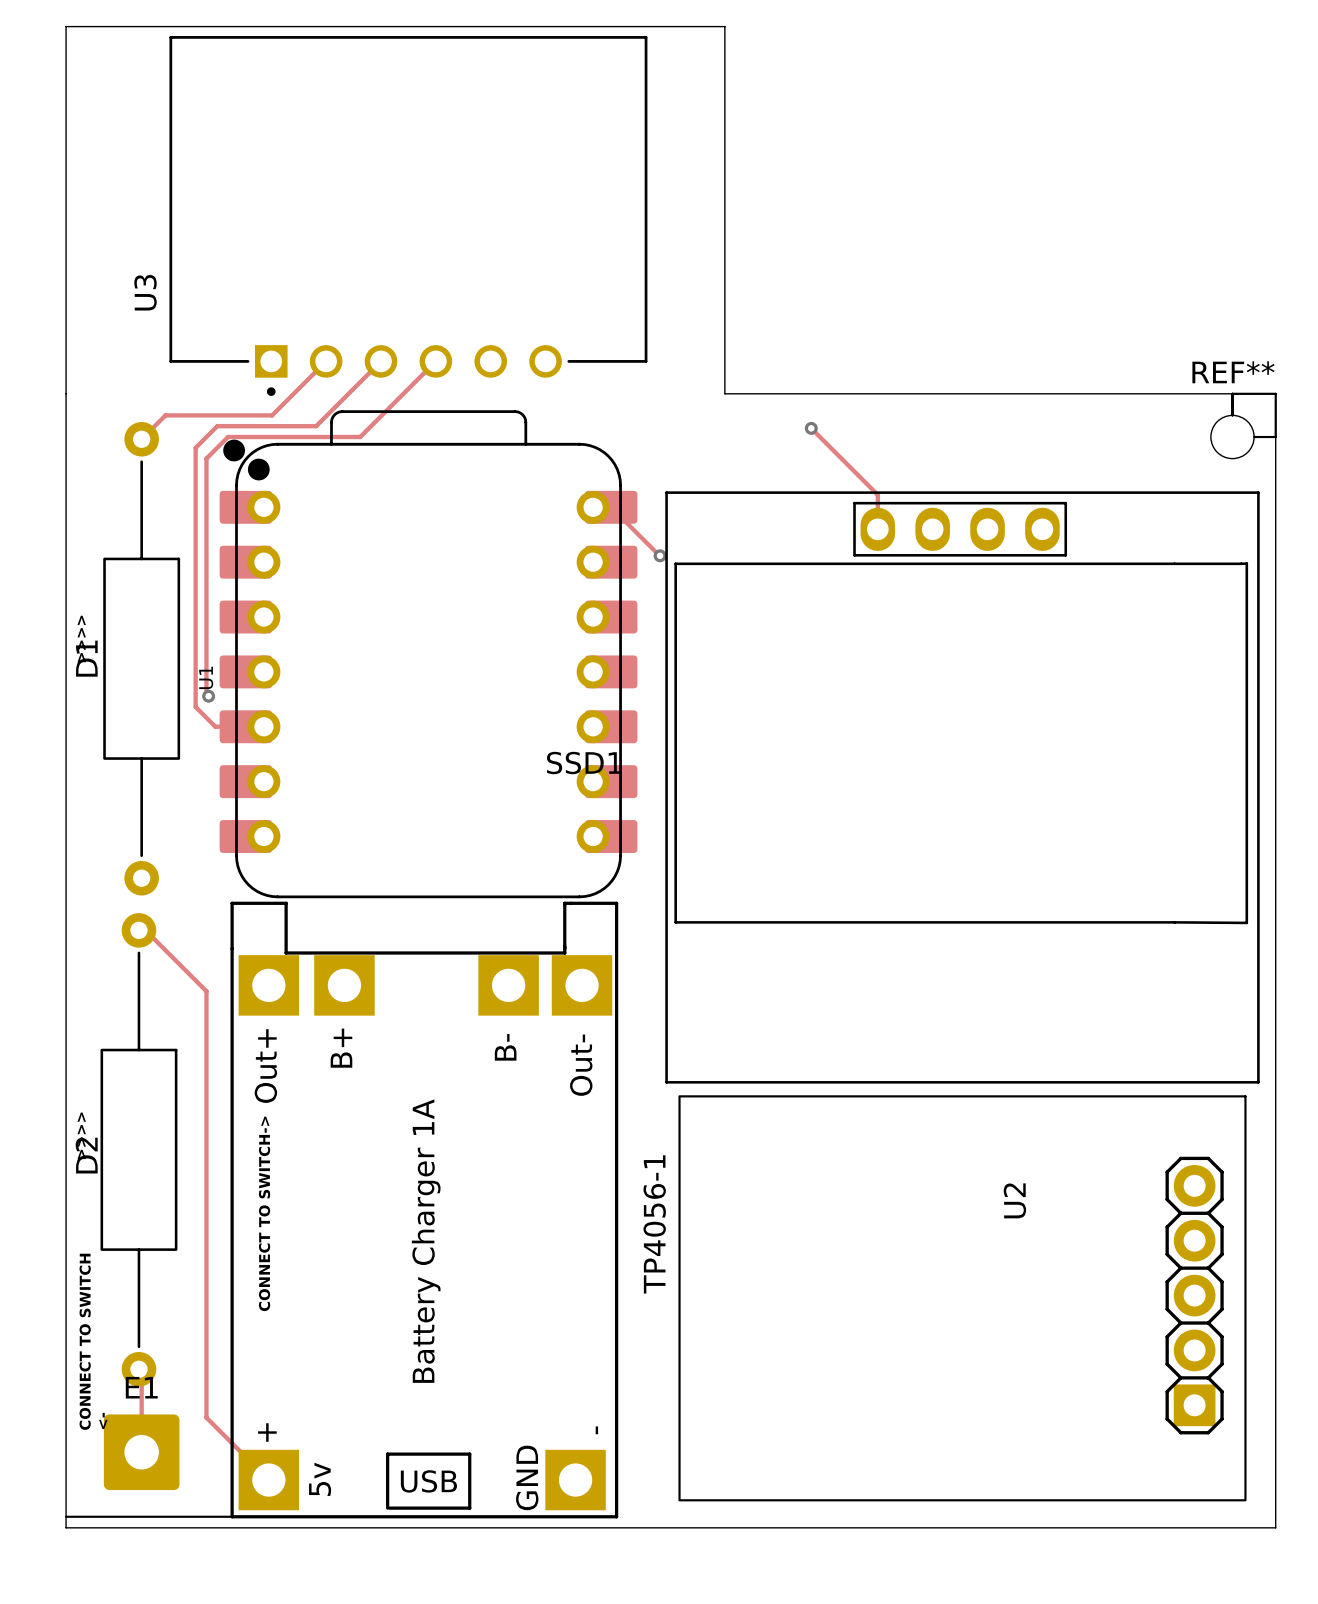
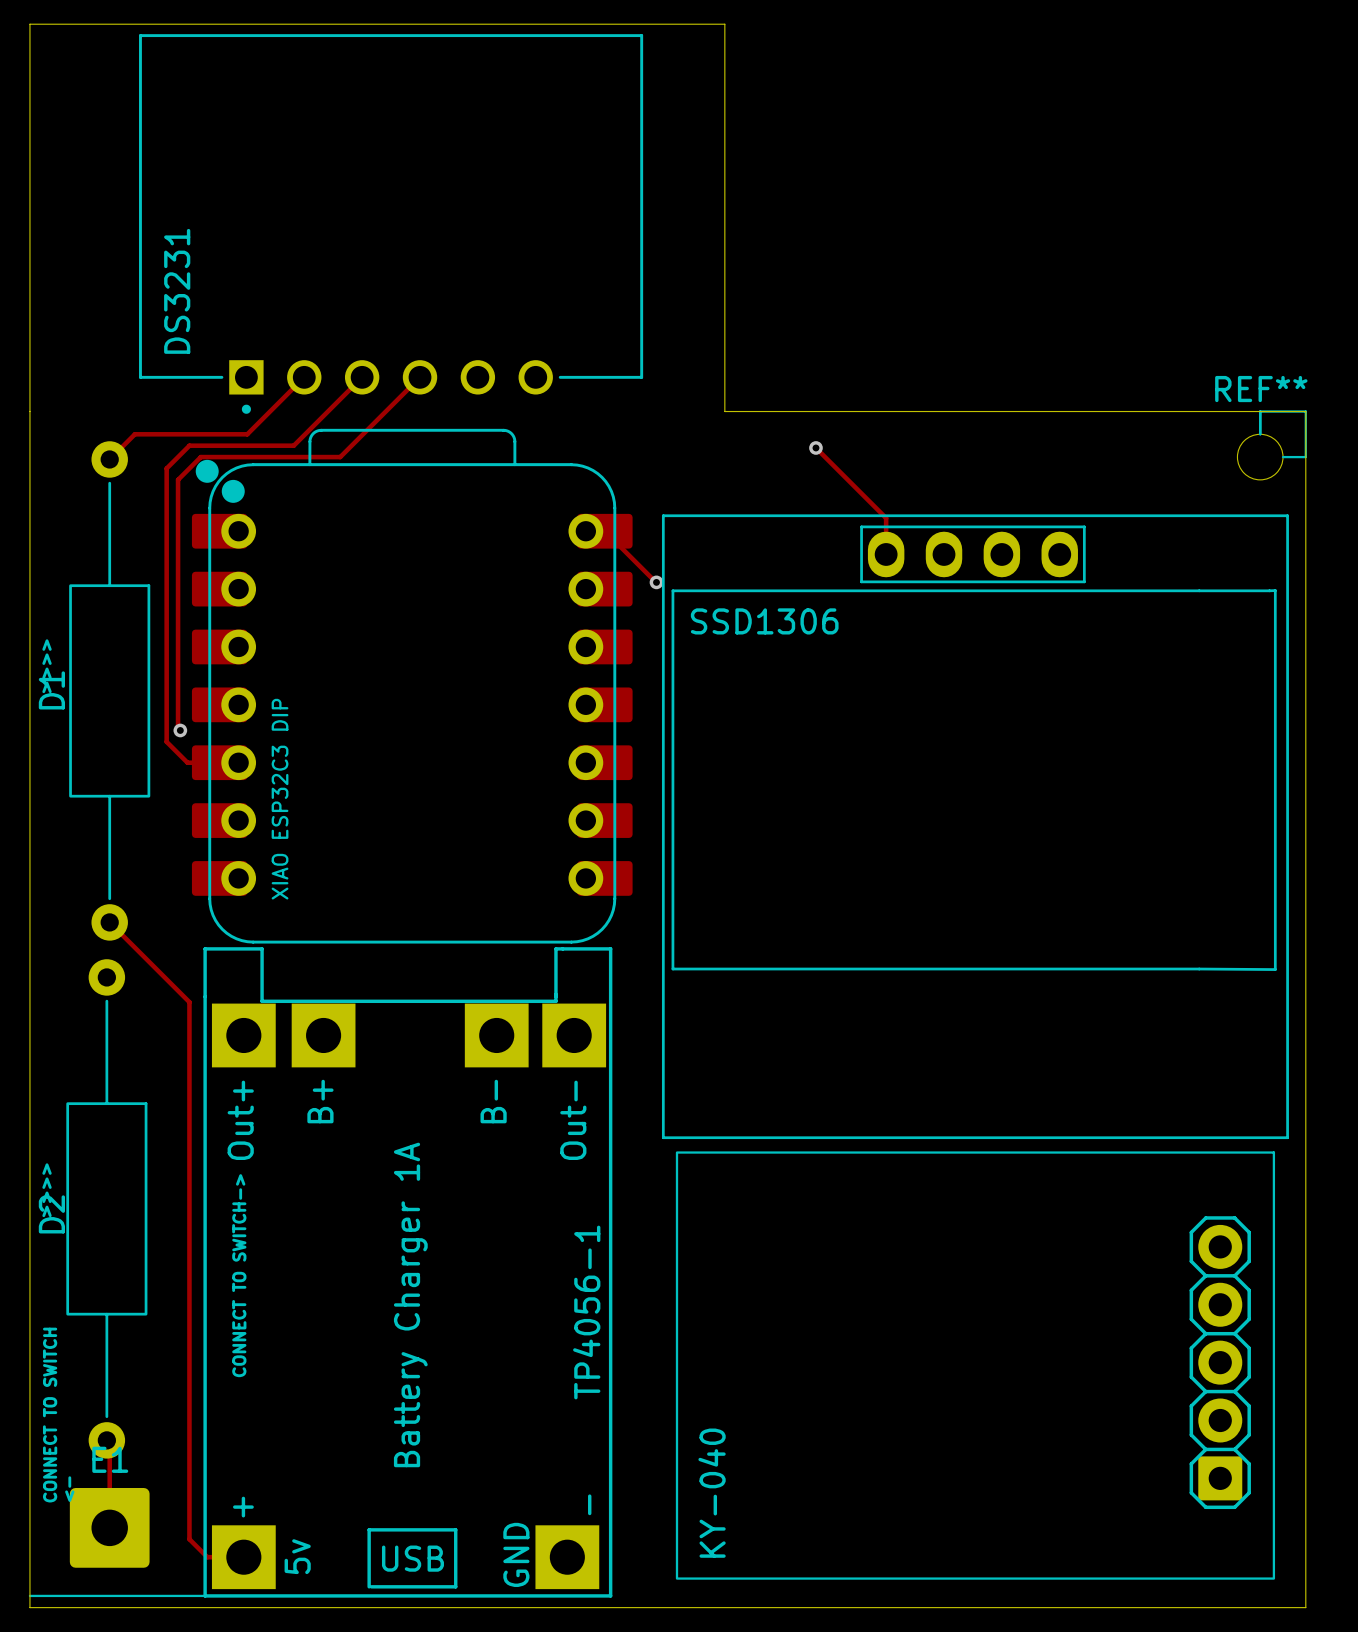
U3 name: U3 (145, 292) -> DS3231 (177, 291)
U1 name: U1 (206, 677) -> XIAO ESP32C3 DIP (280, 799)
SSD1 name: SSD1 (584, 763) -> SSD1306 (764, 621)
track: (141, 926) (206, 991) (206, 1417) (268, 1480) -> (109, 922) (189, 1002) (189, 1539) (207, 1557) (243, 1557)
U2 name: U2 (1014, 1200) -> KY-040 (712, 1493)
TP4056-1 name position: TP4056-1 (654, 1224) -> TP4056-1 (586, 1312)

